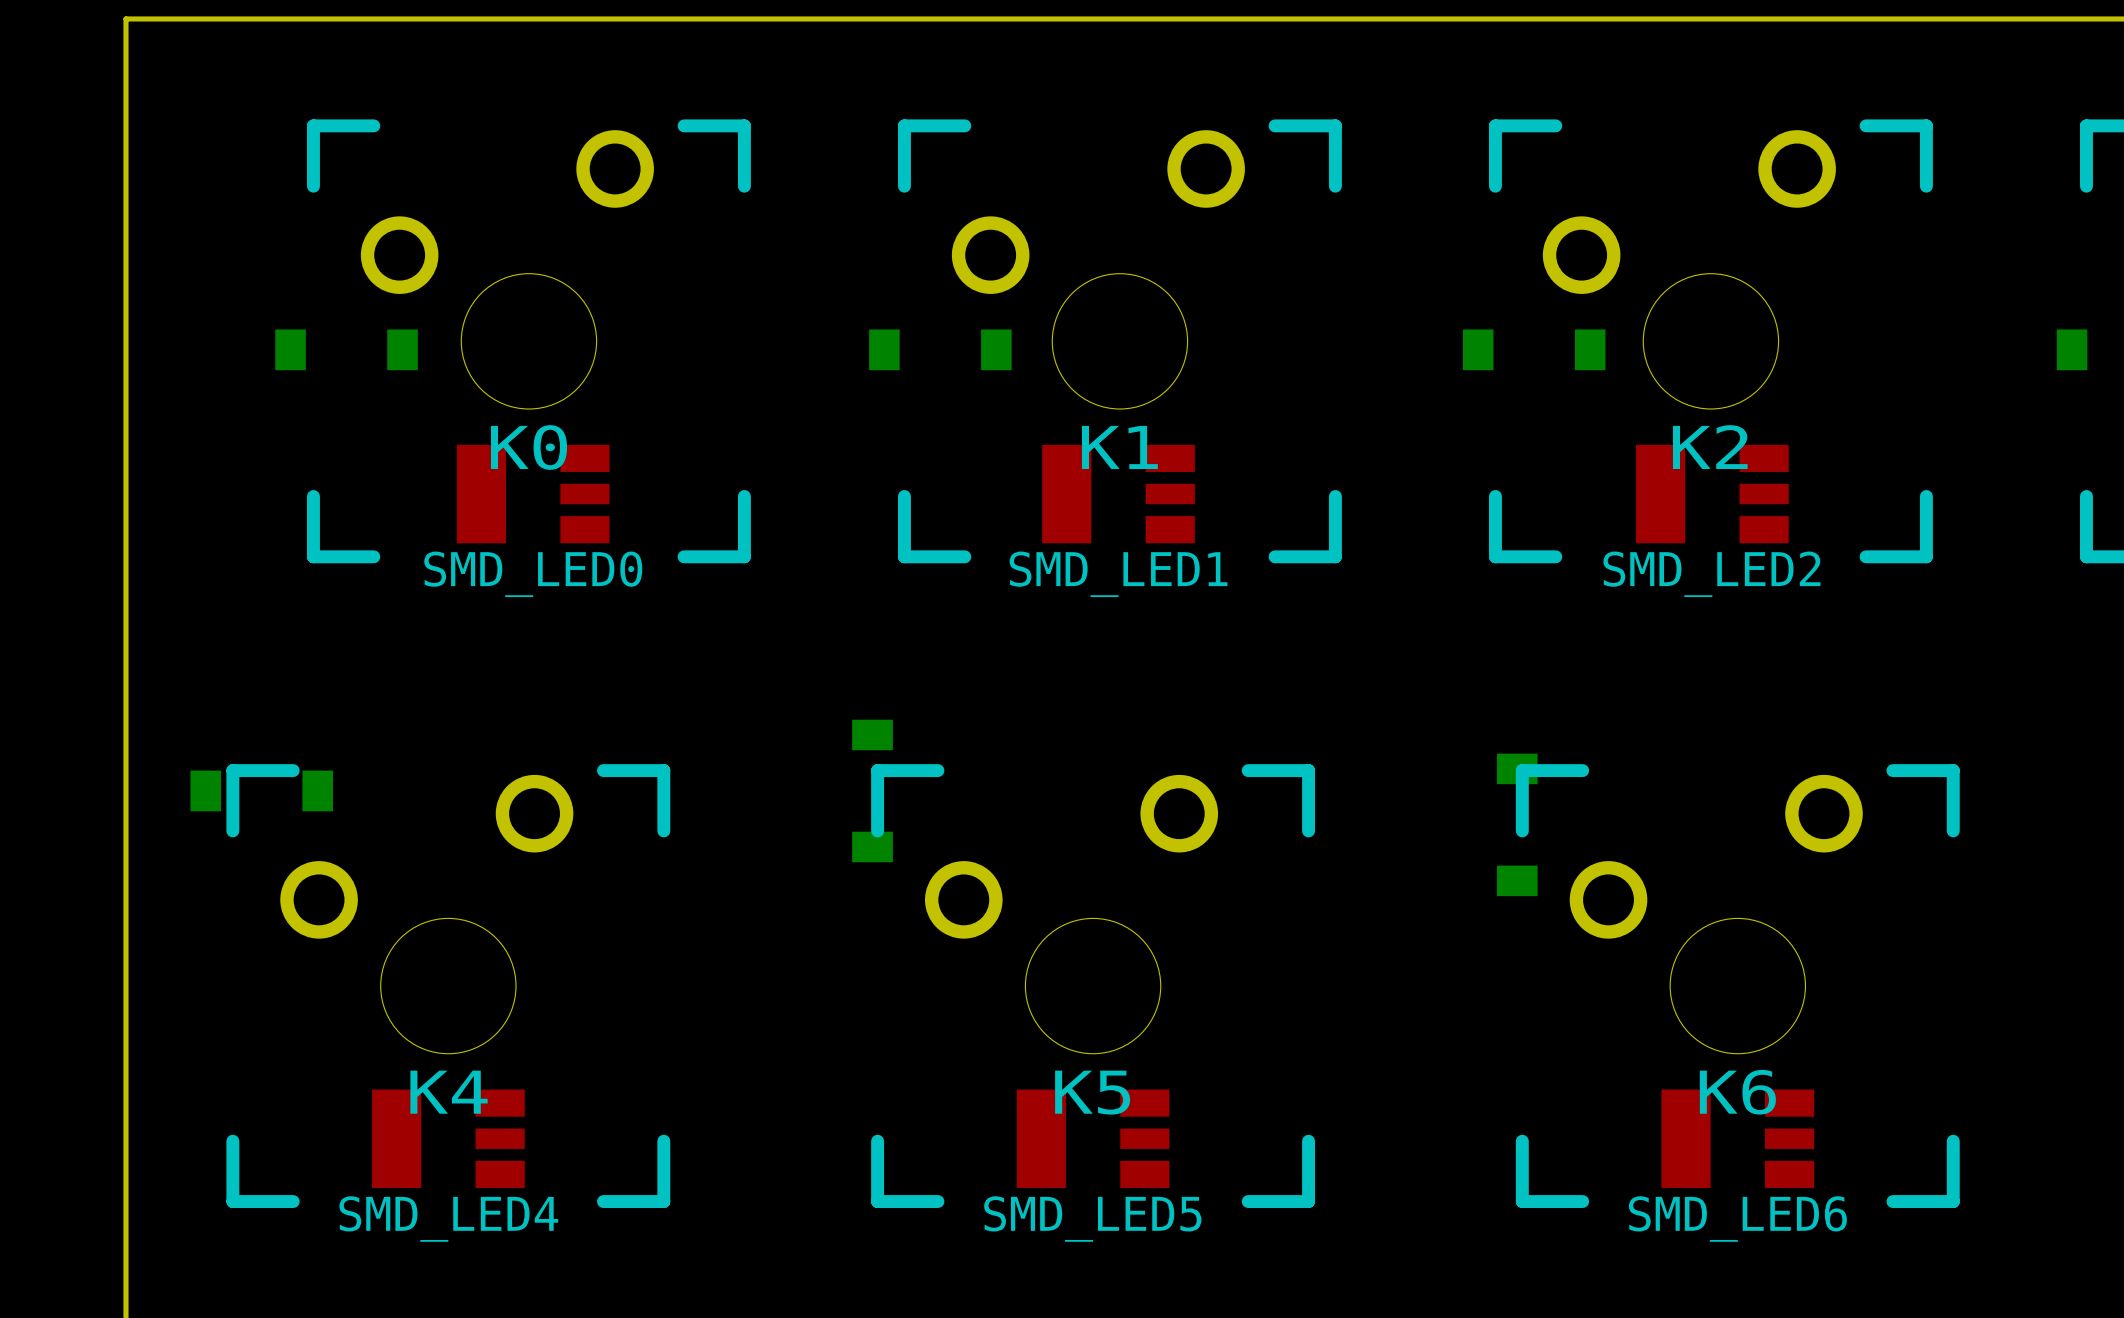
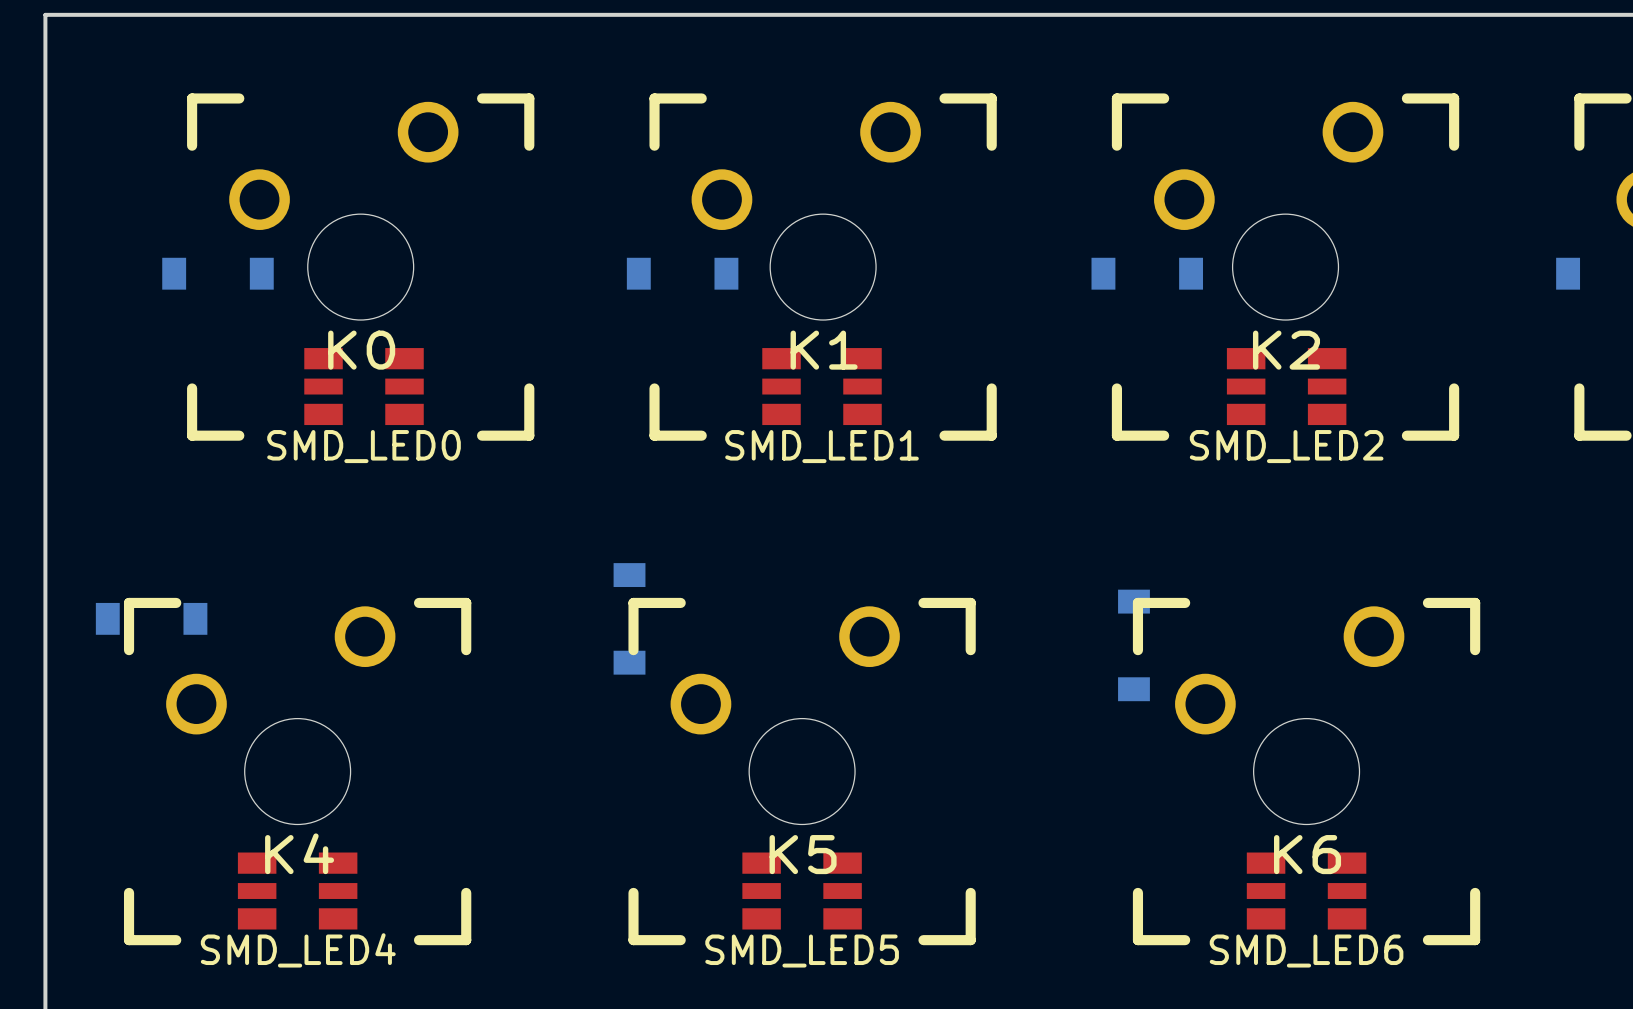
SMD_LED0 footprint: [456, 444, 610, 544] -> [304, 348, 424, 426]
SMD_LED1 footprint: [1042, 444, 1195, 544] -> [762, 348, 882, 426]
SMD_LED2 footprint: [1636, 444, 1789, 544] -> [1226, 348, 1347, 426]
SMD_LED4 footprint: [372, 1089, 525, 1188] -> [237, 852, 358, 930]
SMD_LED5 footprint: [1016, 1089, 1170, 1188] -> [742, 852, 862, 930]
SMD_LED6 footprint: [1661, 1089, 1815, 1188] -> [1246, 852, 1367, 930]

